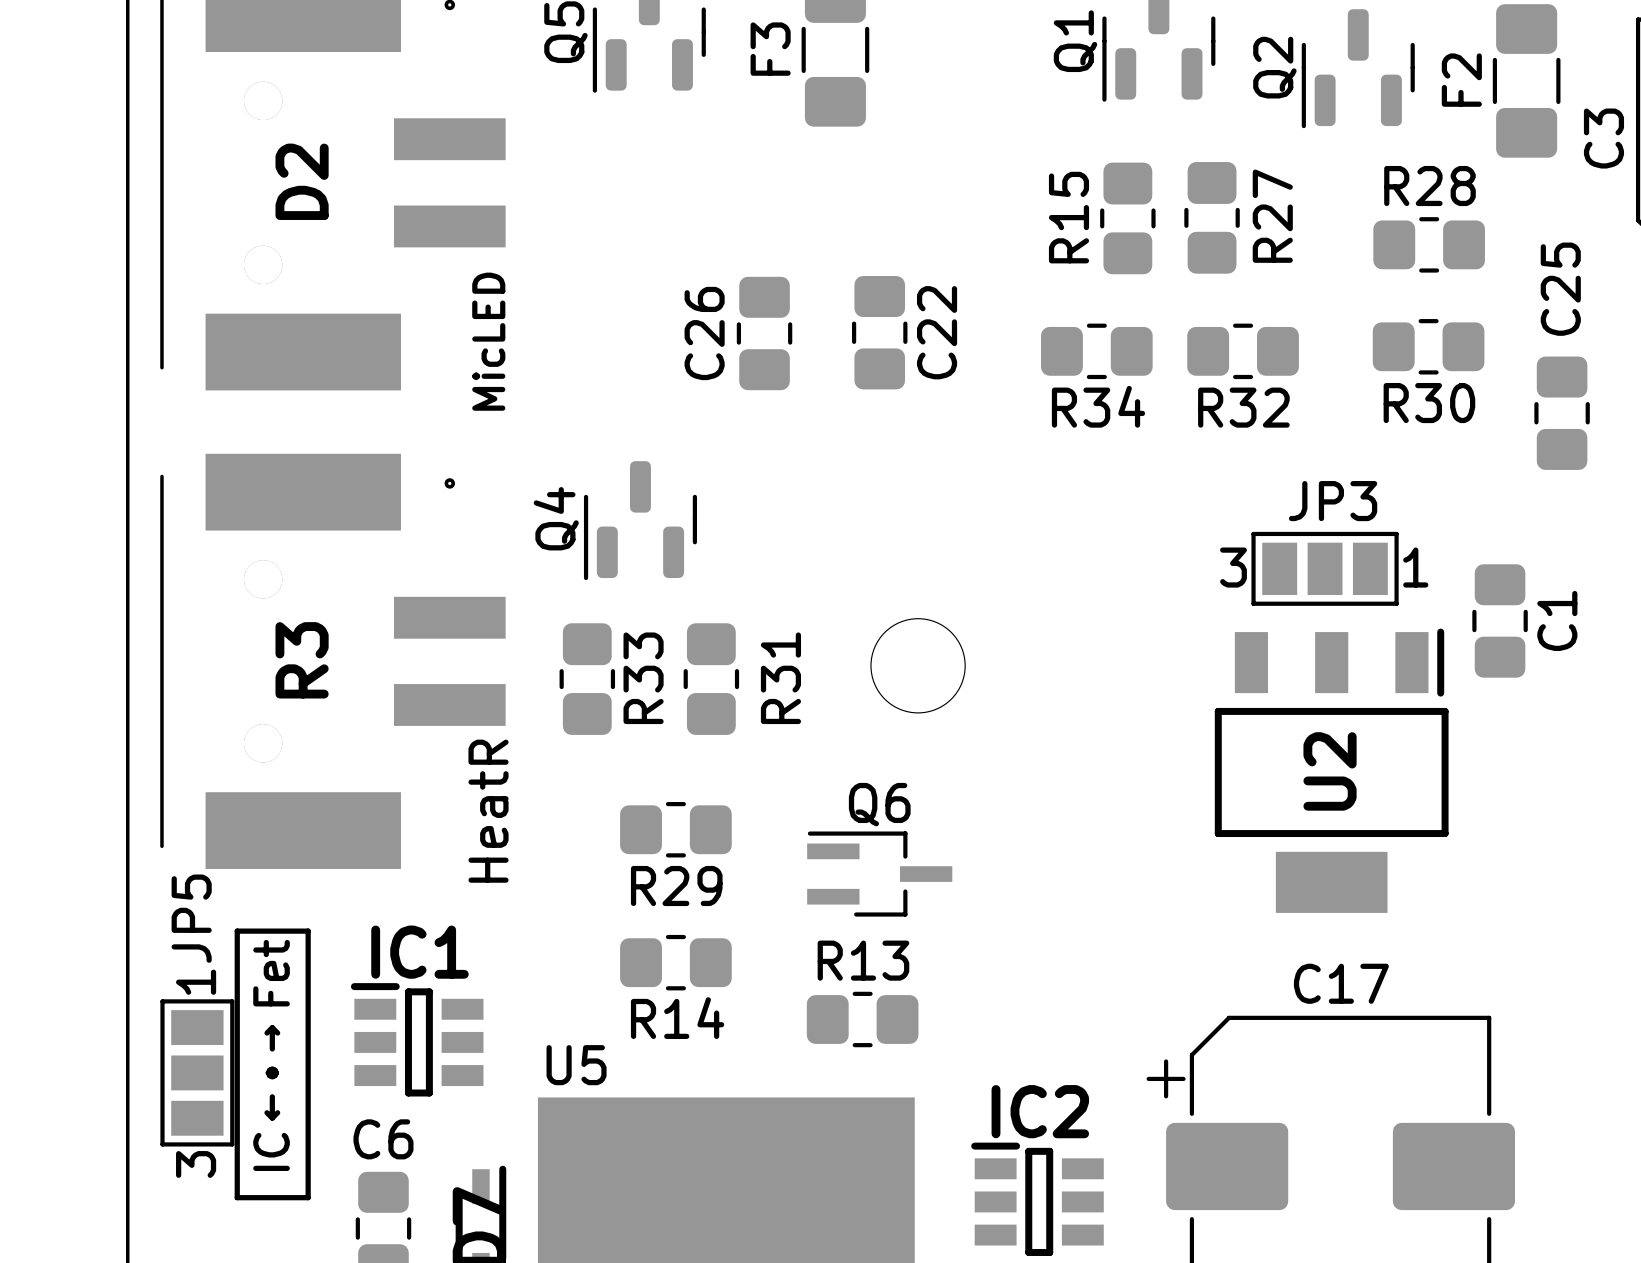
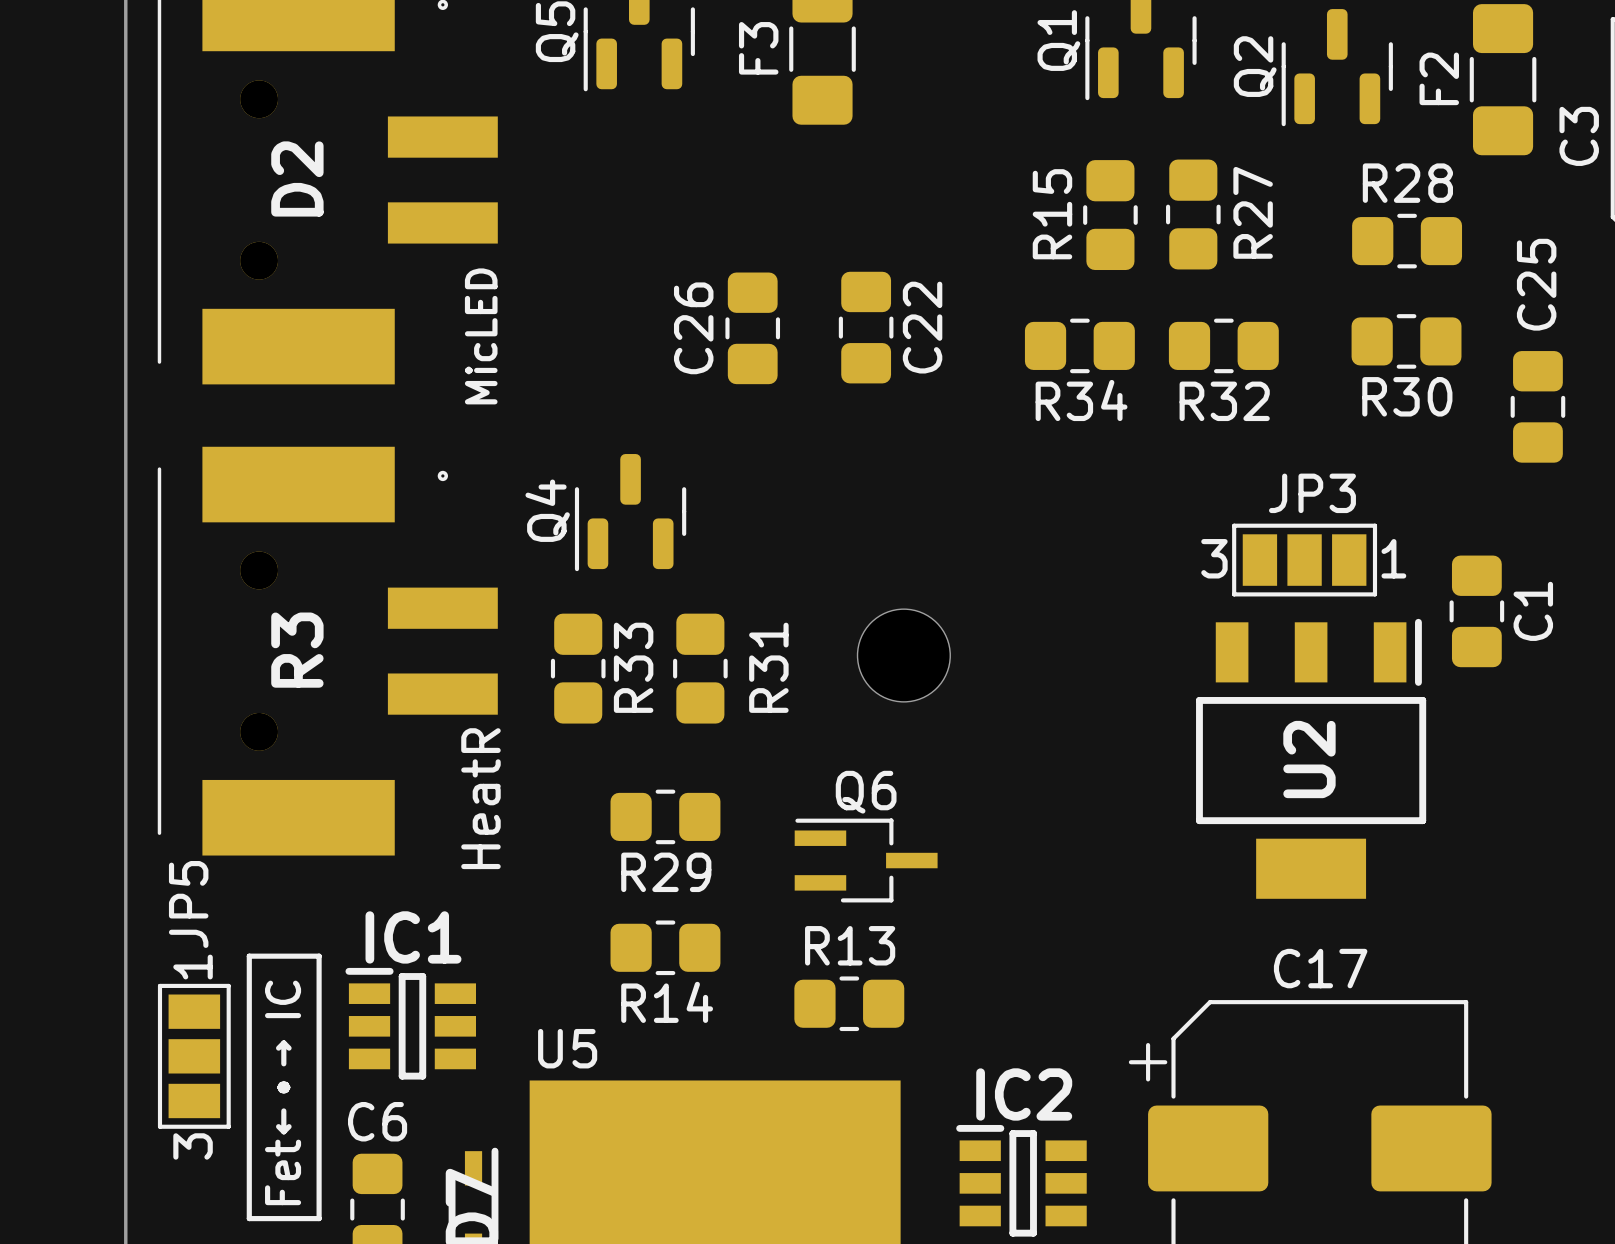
line: (237, 931) (308, 931) (308, 1197) (237, 1197) (237, 931) -> (249, 956) (249, 1218) (319, 1218) (319, 956) (249, 956)
text position: Fet (271, 973) -> Fet (283, 1172)
text position: ←•→ (272, 1072) -> ←•→ (283, 1087)
text position: IC (271, 1151) -> IC (283, 999)

